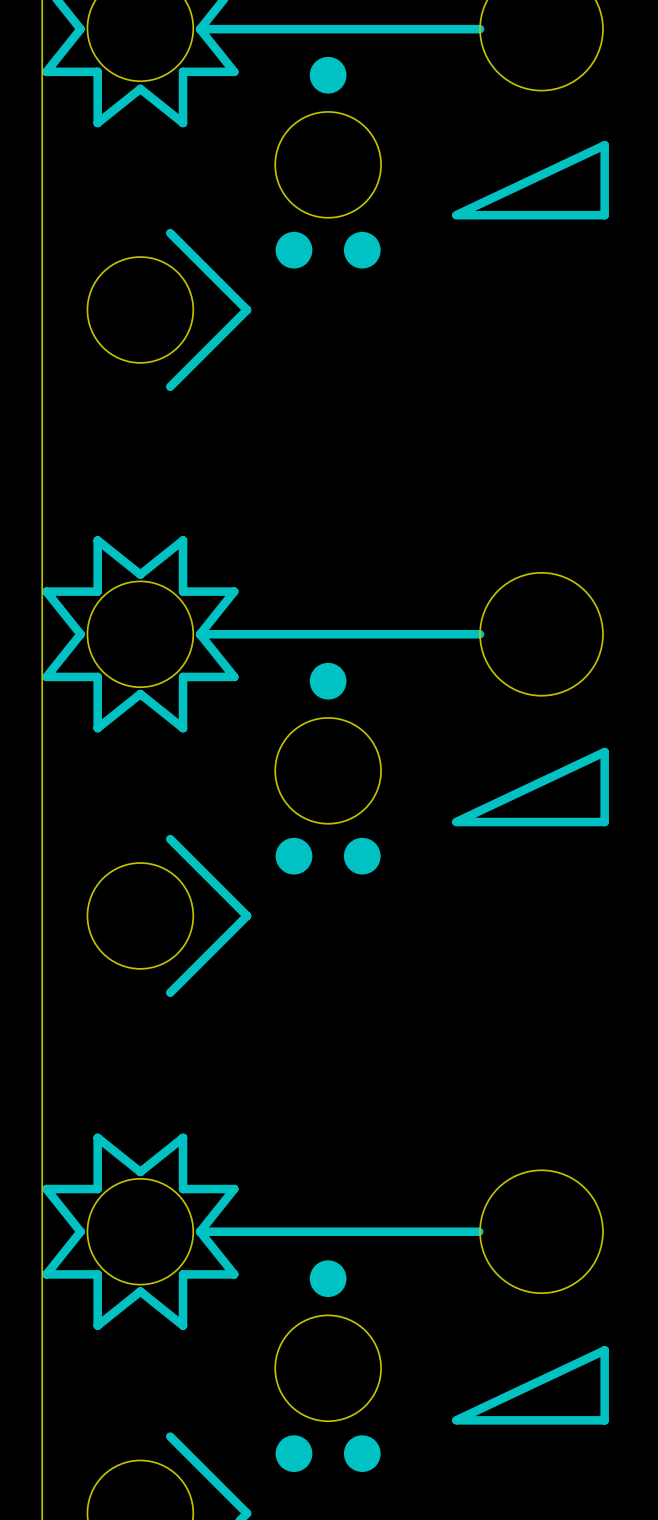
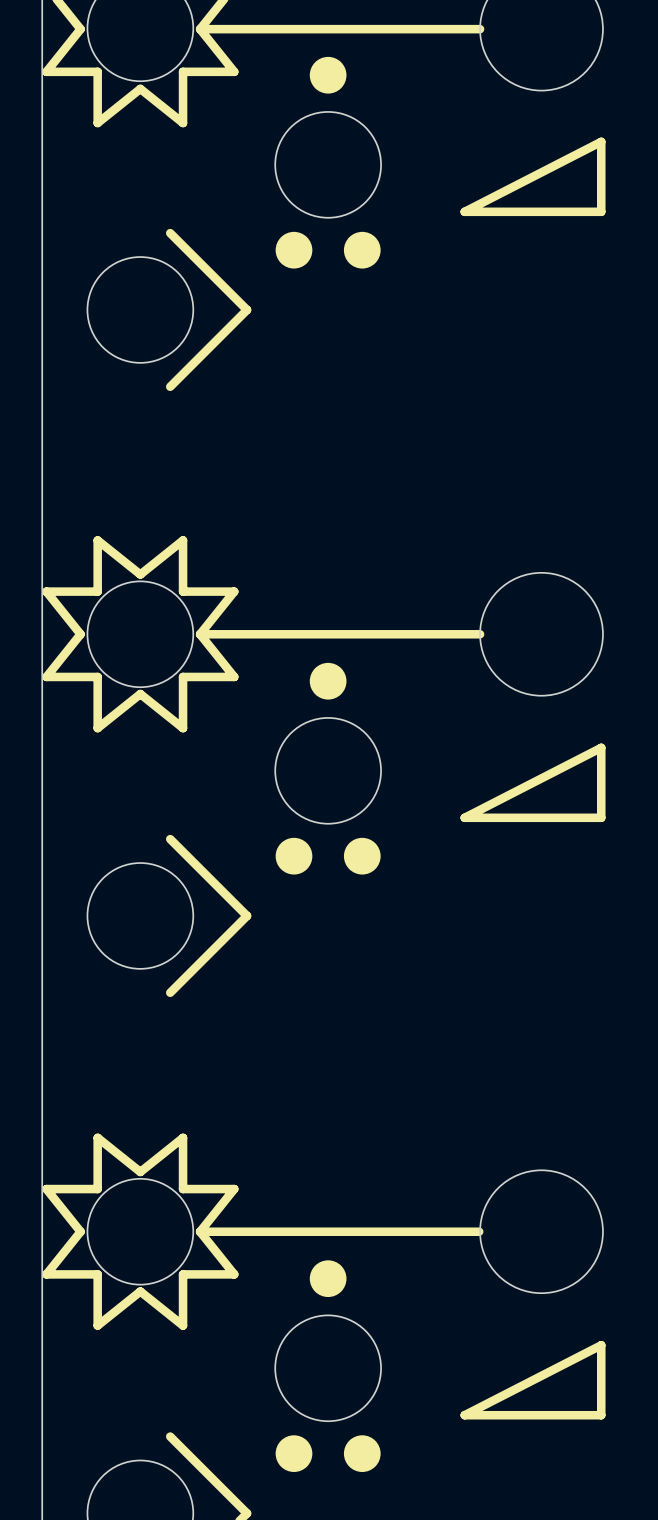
drawing shape: [451, 140, 609, 220] -> [460, 137, 606, 217]
drawing shape: [451, 747, 609, 827] -> [460, 743, 606, 823]
drawing shape: [451, 1346, 609, 1425] -> [460, 1340, 606, 1420]

